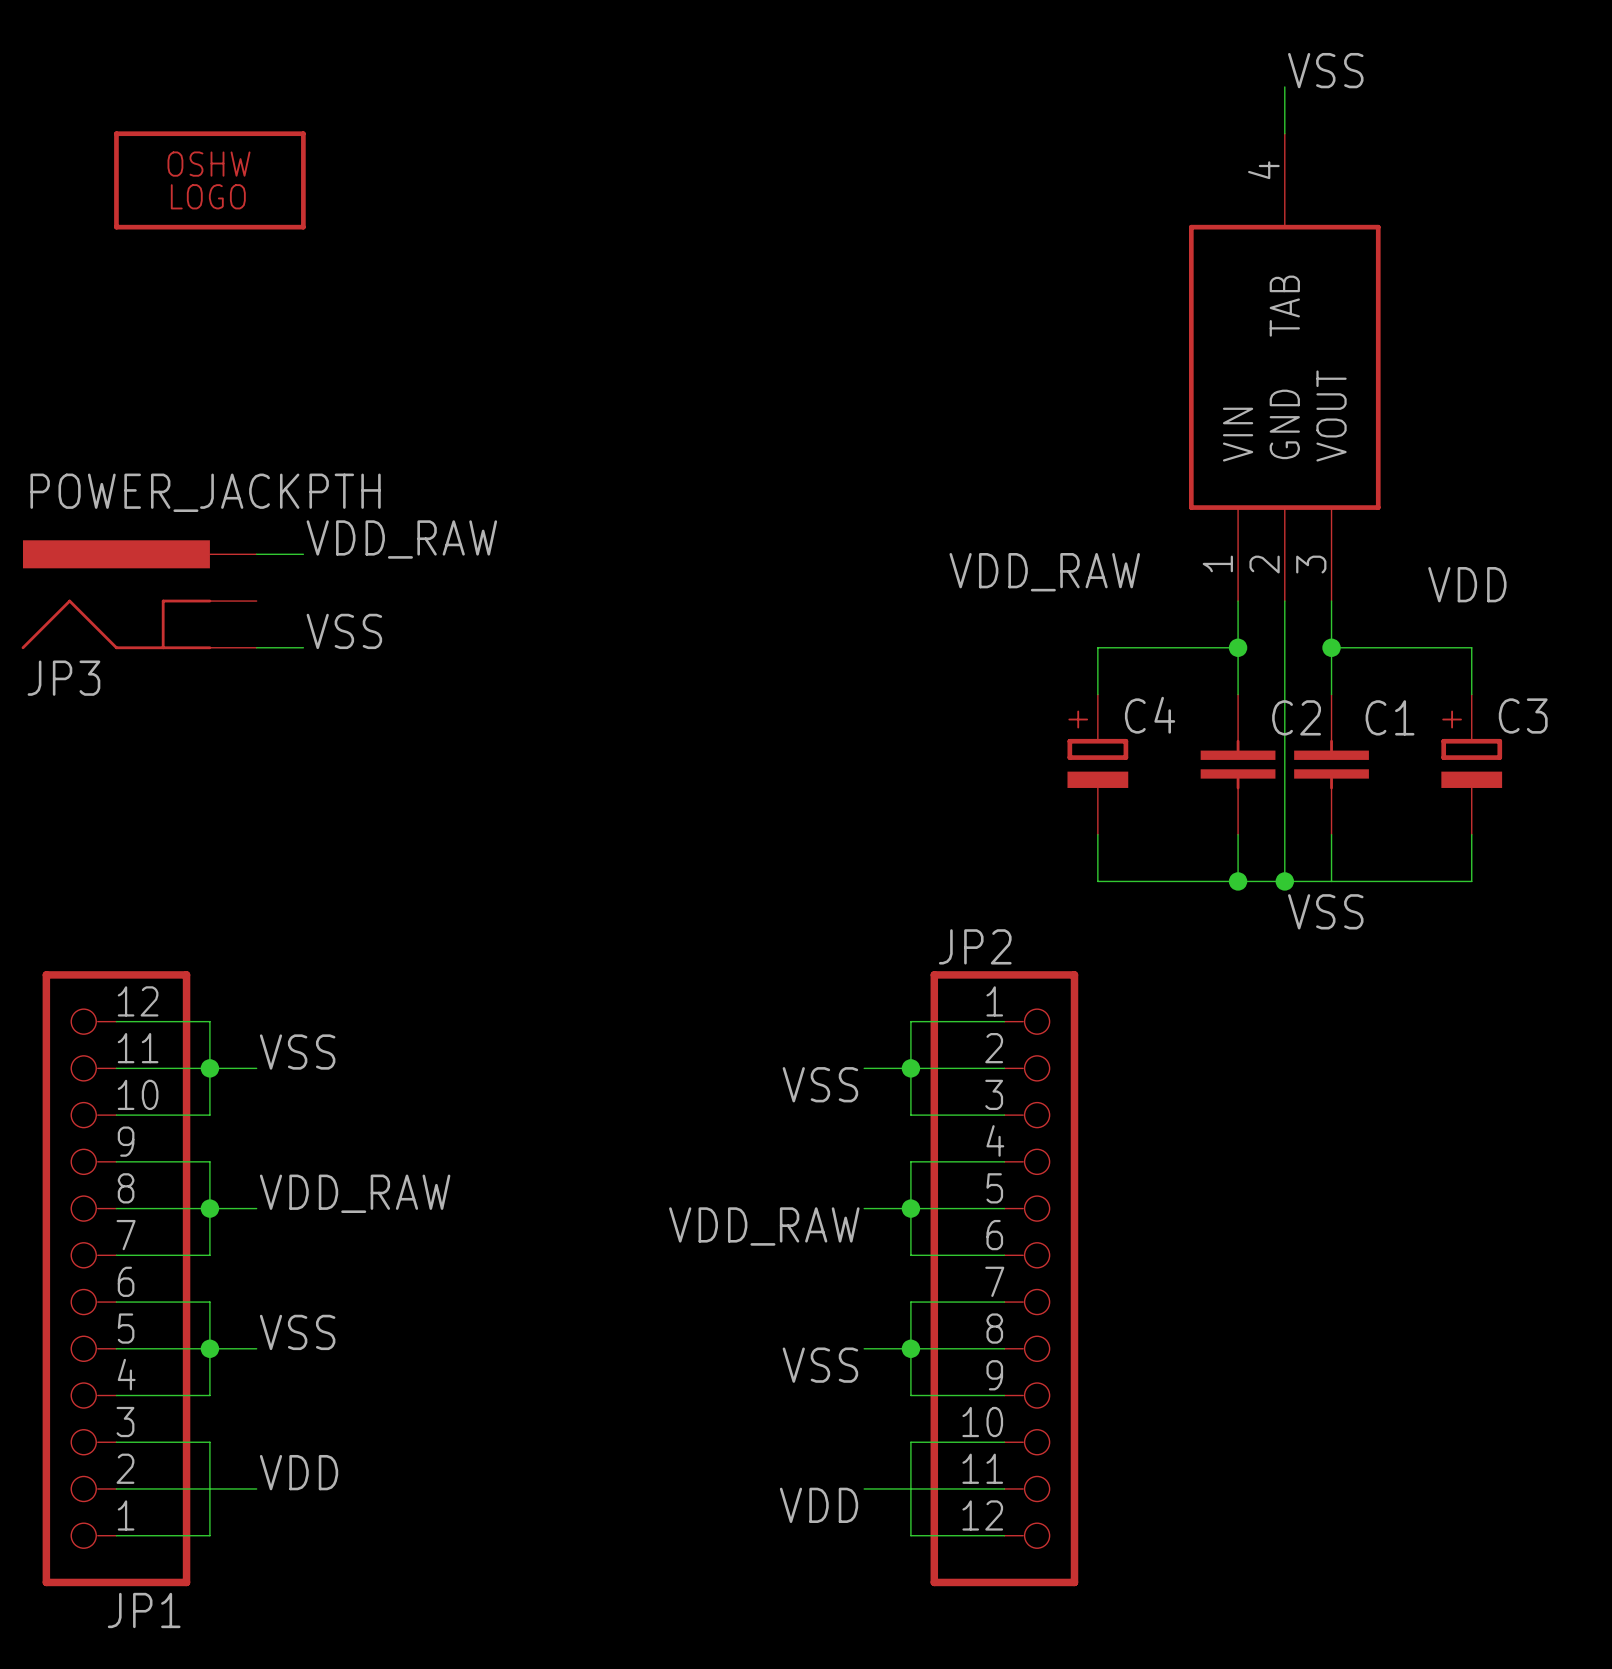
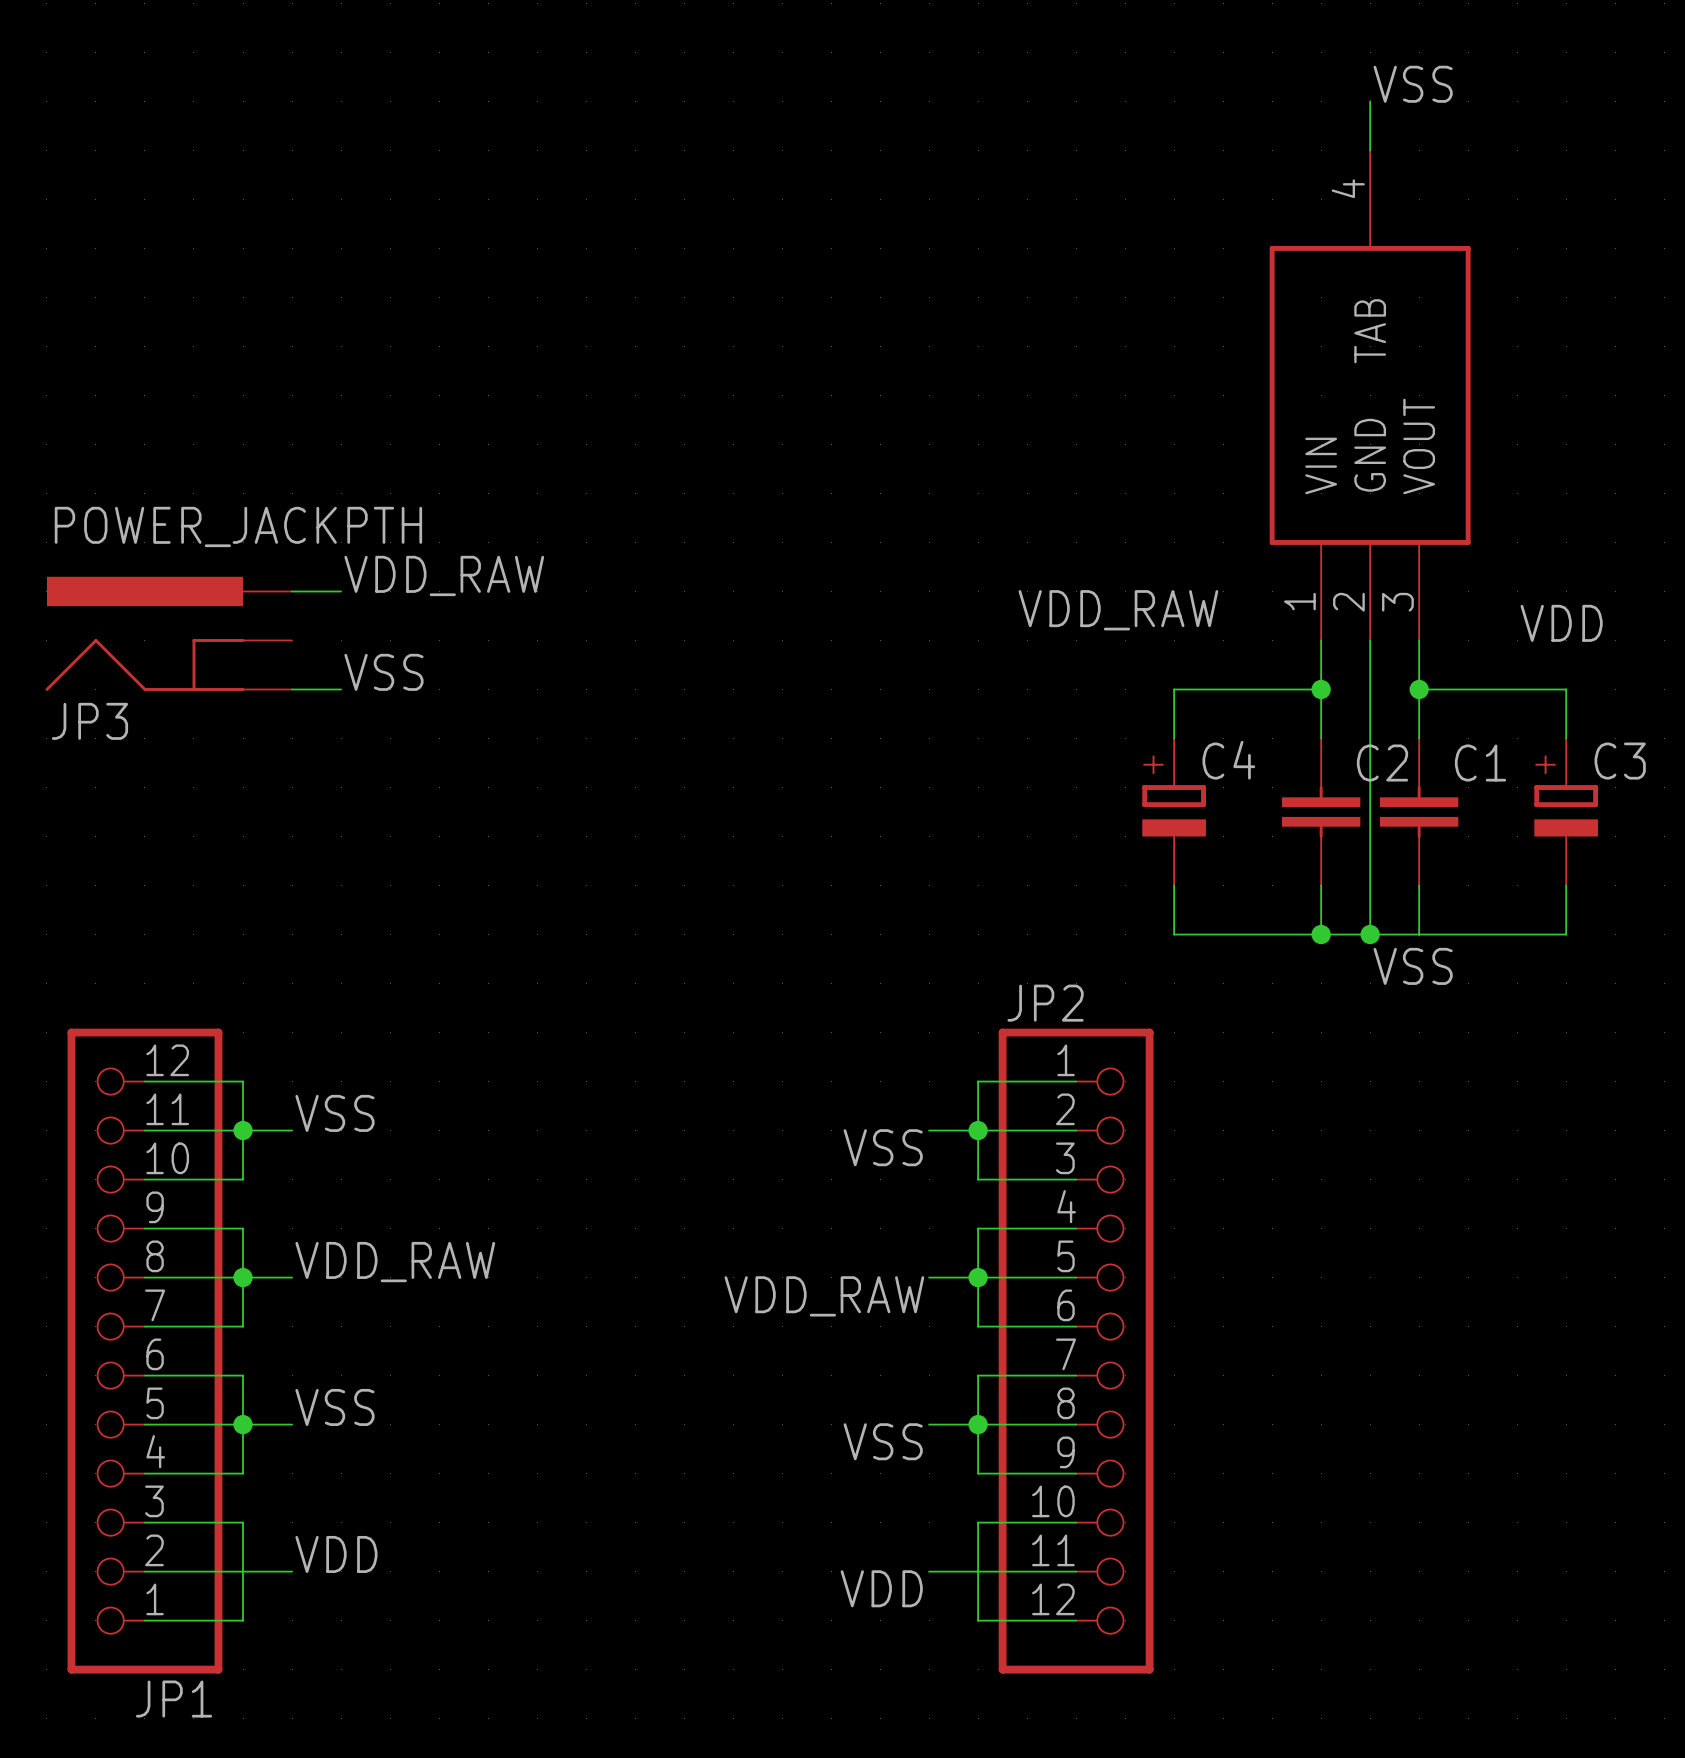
part: (209, 180) -> none

